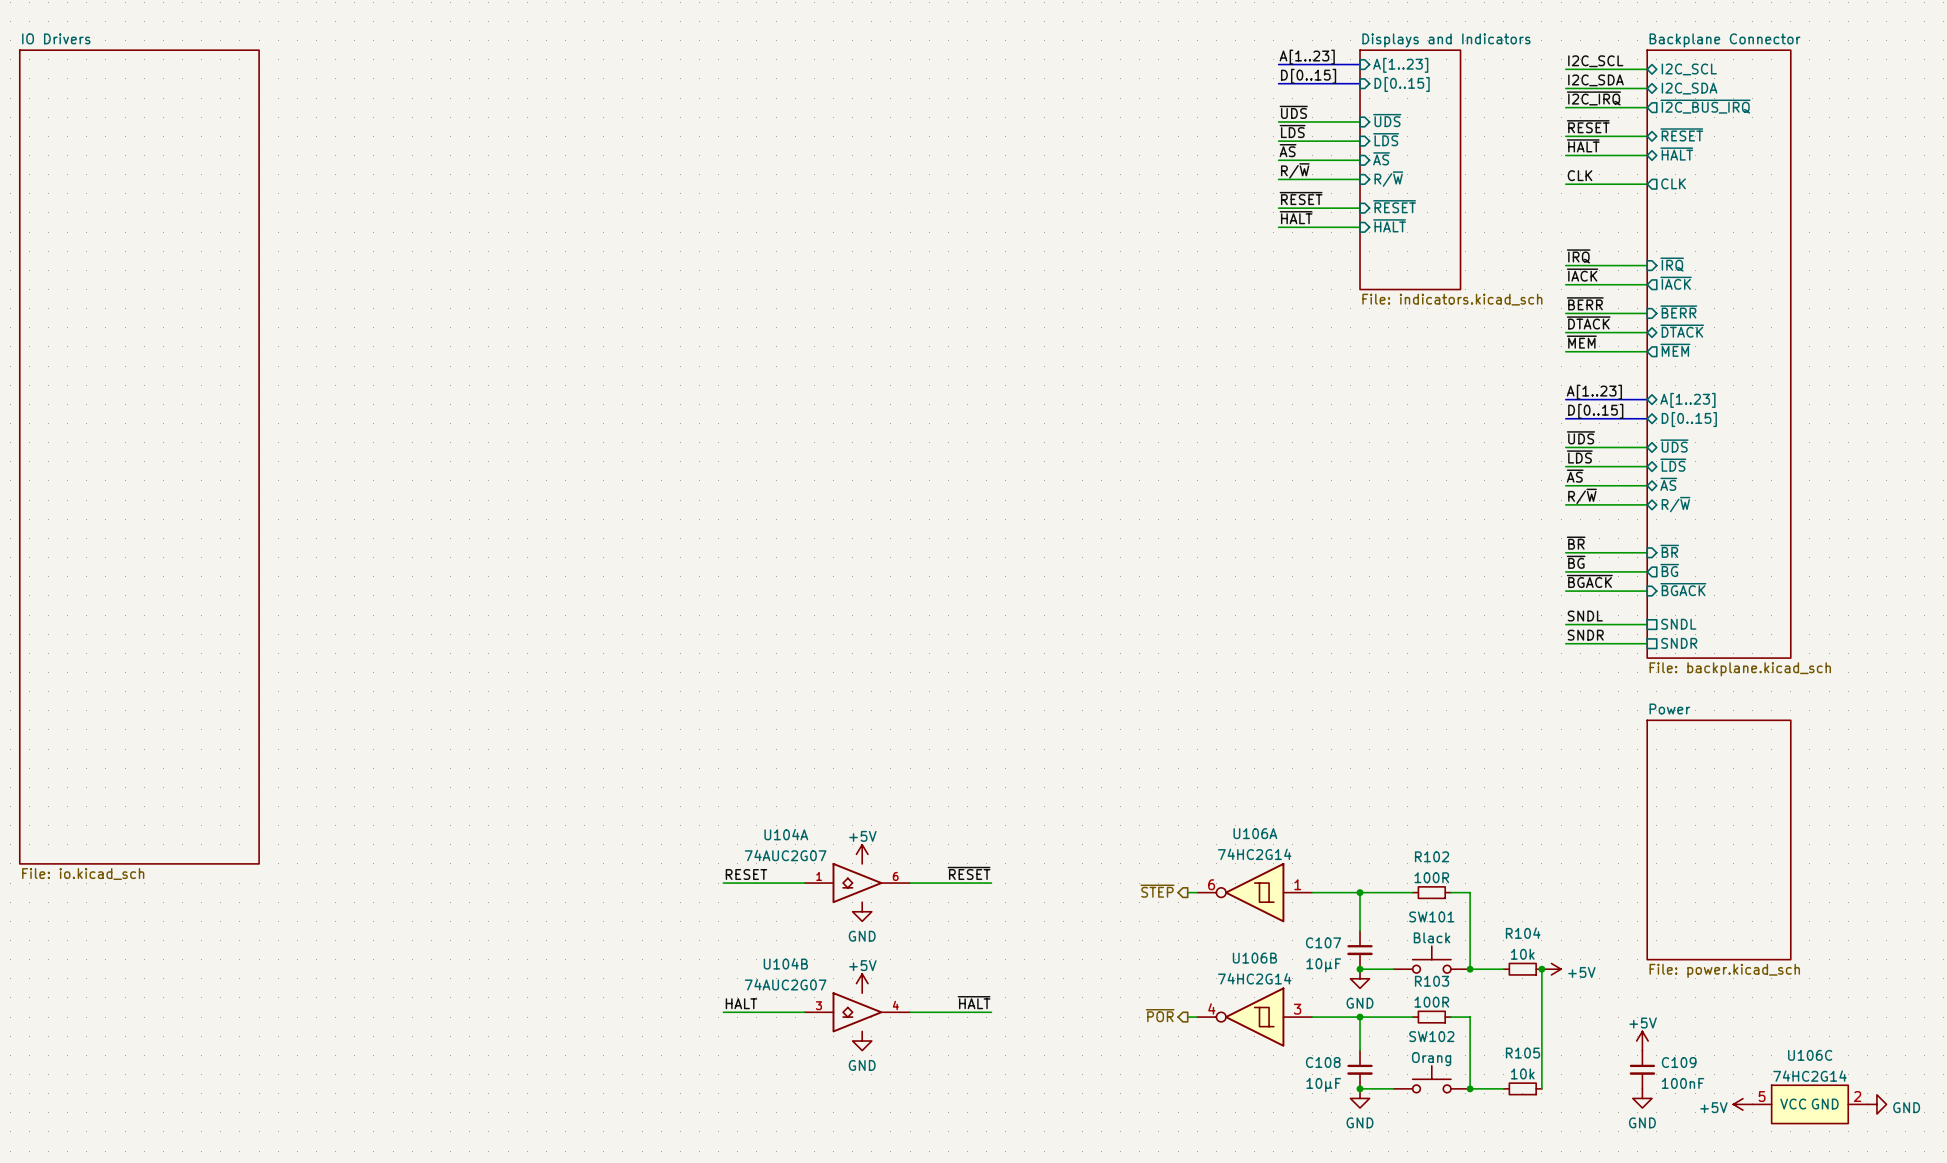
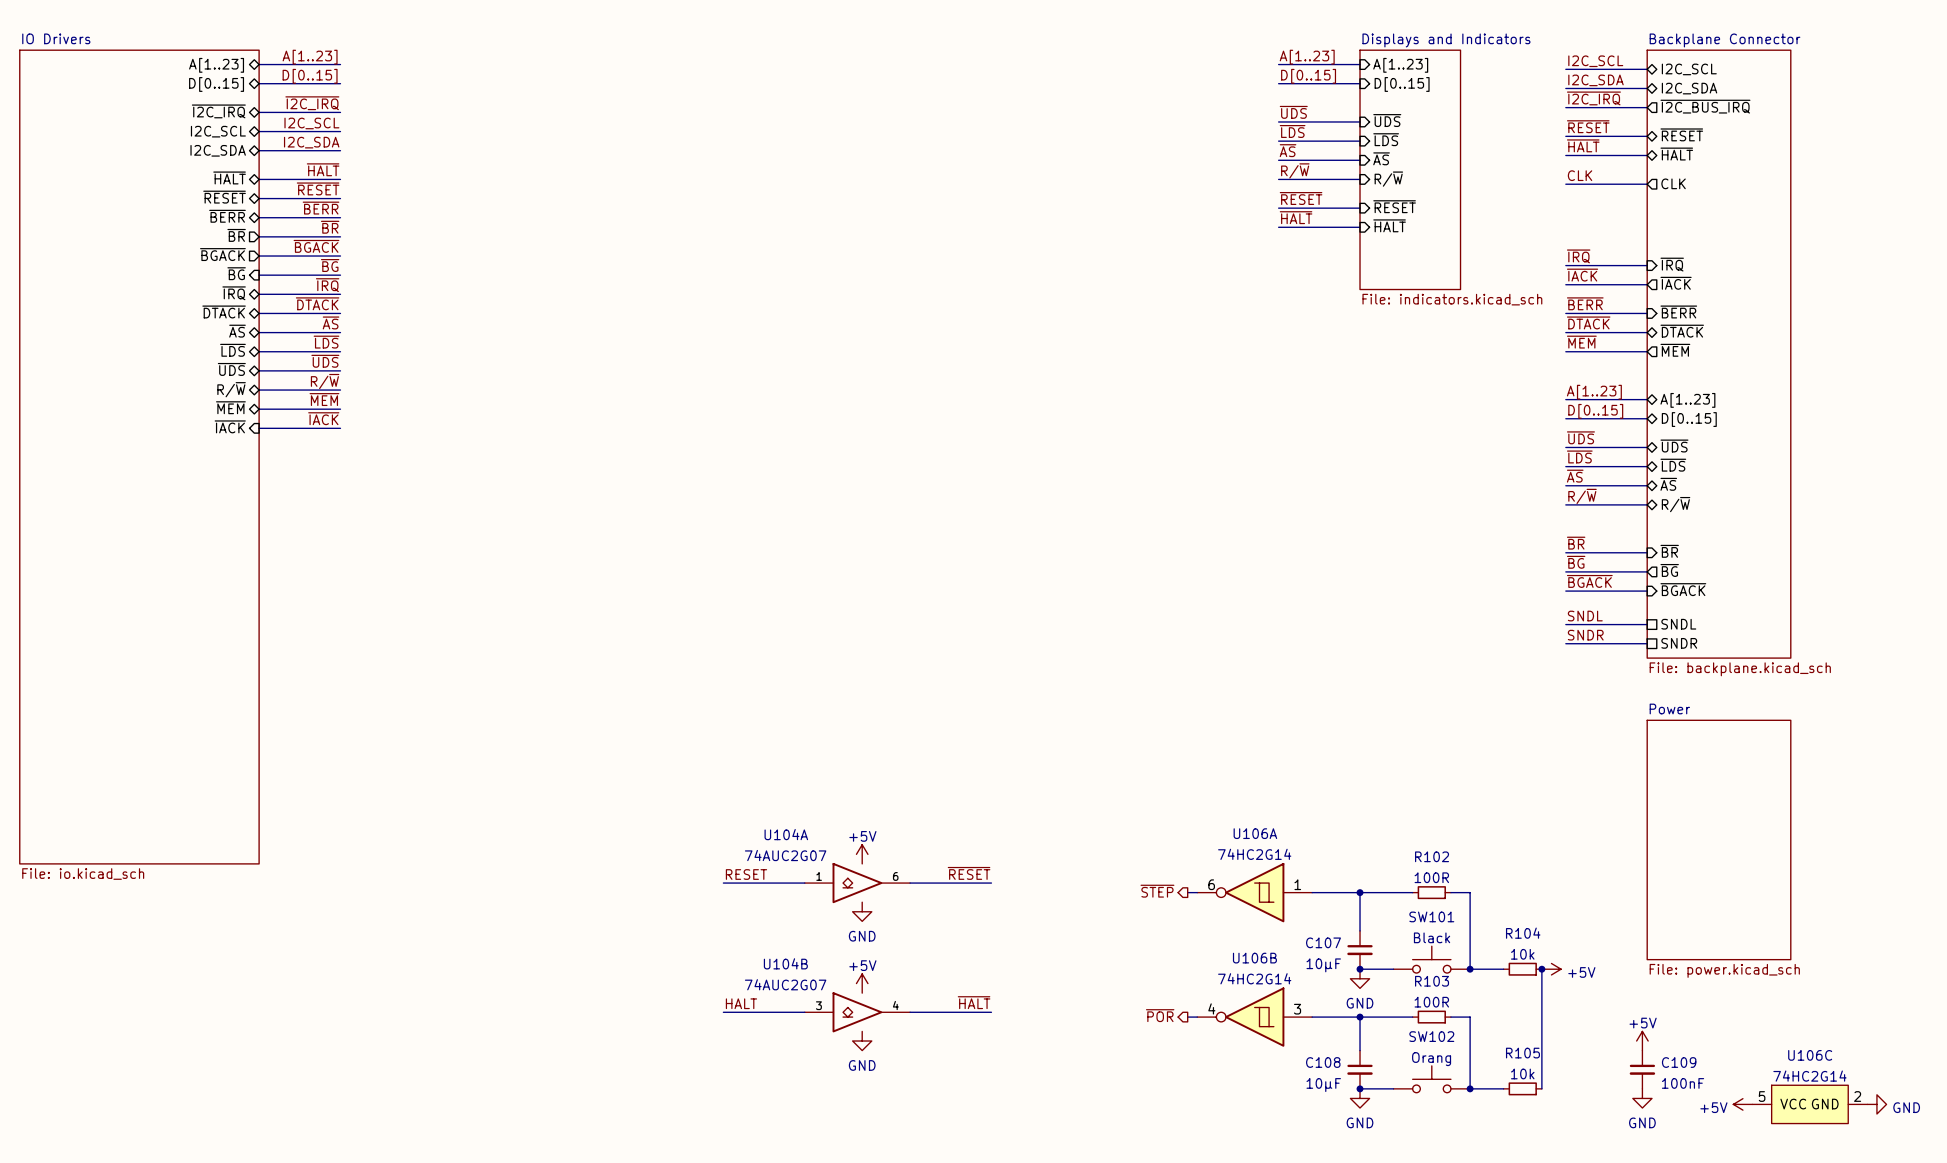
label: none -> A[1..23] (310, 57)
bus: none -> (259, 64) (340, 64)
sheet pin: none -> A[1..23] (216, 65)
label: none -> D[0..15] (310, 76)
bus: none -> (259, 83) (340, 83)
sheet pin: none -> D[0..15] (216, 84)
label: none -> ~{I2C_IRQ} (312, 103)
sheet pin: none -> ~{I2C_IRQ} (218, 111)
wire: none -> (259, 112) (340, 112)
label: none -> I2C_SCL (311, 123)
sheet pin: none -> I2C_SCL (218, 131)
wire: none -> (259, 131) (340, 131)
label: none -> I2C_SDA (311, 142)
sheet pin: none -> I2C_SDA (218, 150)
wire: none -> (259, 150) (340, 150)
label: none -> ~{HALT} (323, 169)
sheet pin: none -> ~{HALT} (229, 177)
wire: none -> (259, 179) (340, 179)
label: none -> ~{RESET} (318, 188)
sheet pin: none -> ~{RESET} (224, 197)
wire: none -> (259, 198) (340, 198)
label: none -> ~{BERR} (321, 208)
sheet pin: none -> ~{BERR} (227, 216)
wire: none -> (259, 217) (340, 217)
label: none -> ~{BR} (330, 227)
sheet pin: none -> ~{BR} (236, 235)
wire: none -> (259, 236) (340, 236)
label: none -> ~{BGACK} (316, 246)
sheet pin: none -> ~{BGACK} (222, 254)
wire: none -> (259, 256) (340, 256)
label: none -> ~{BG} (330, 265)
sheet pin: none -> ~{BG} (236, 273)
wire: none -> (259, 275) (340, 275)
label: none -> ~{IRQ} (327, 285)
sheet pin: none -> ~{IRQ} (234, 293)
wire: none -> (259, 294) (340, 294)
label: none -> ~{DTACK} (317, 303)
sheet pin: none -> ~{DTACK} (224, 311)
wire: none -> (259, 313) (340, 313)
label: none -> ~{AS} (331, 322)
sheet pin: none -> ~{AS} (237, 331)
wire: none -> (259, 332) (340, 332)
label: none -> ~{LDS} (326, 342)
sheet pin: none -> ~{LDS} (232, 350)
wire: none -> (259, 351) (340, 351)
label: none -> ~{UDS} (325, 361)
sheet pin: none -> ~{UDS} (231, 369)
wire: none -> (259, 370) (340, 370)
label: none -> R/~{W} (325, 381)
sheet pin: none -> R/~{W} (231, 389)
wire: none -> (259, 390) (340, 390)
label: none -> ~{MEM} (324, 399)
sheet pin: none -> ~{MEM} (230, 407)
wire: none -> (259, 409) (340, 409)
label: none -> ~{IACK} (323, 418)
sheet pin: none -> ~{IACK} (230, 426)
wire: none -> (259, 428) (340, 428)

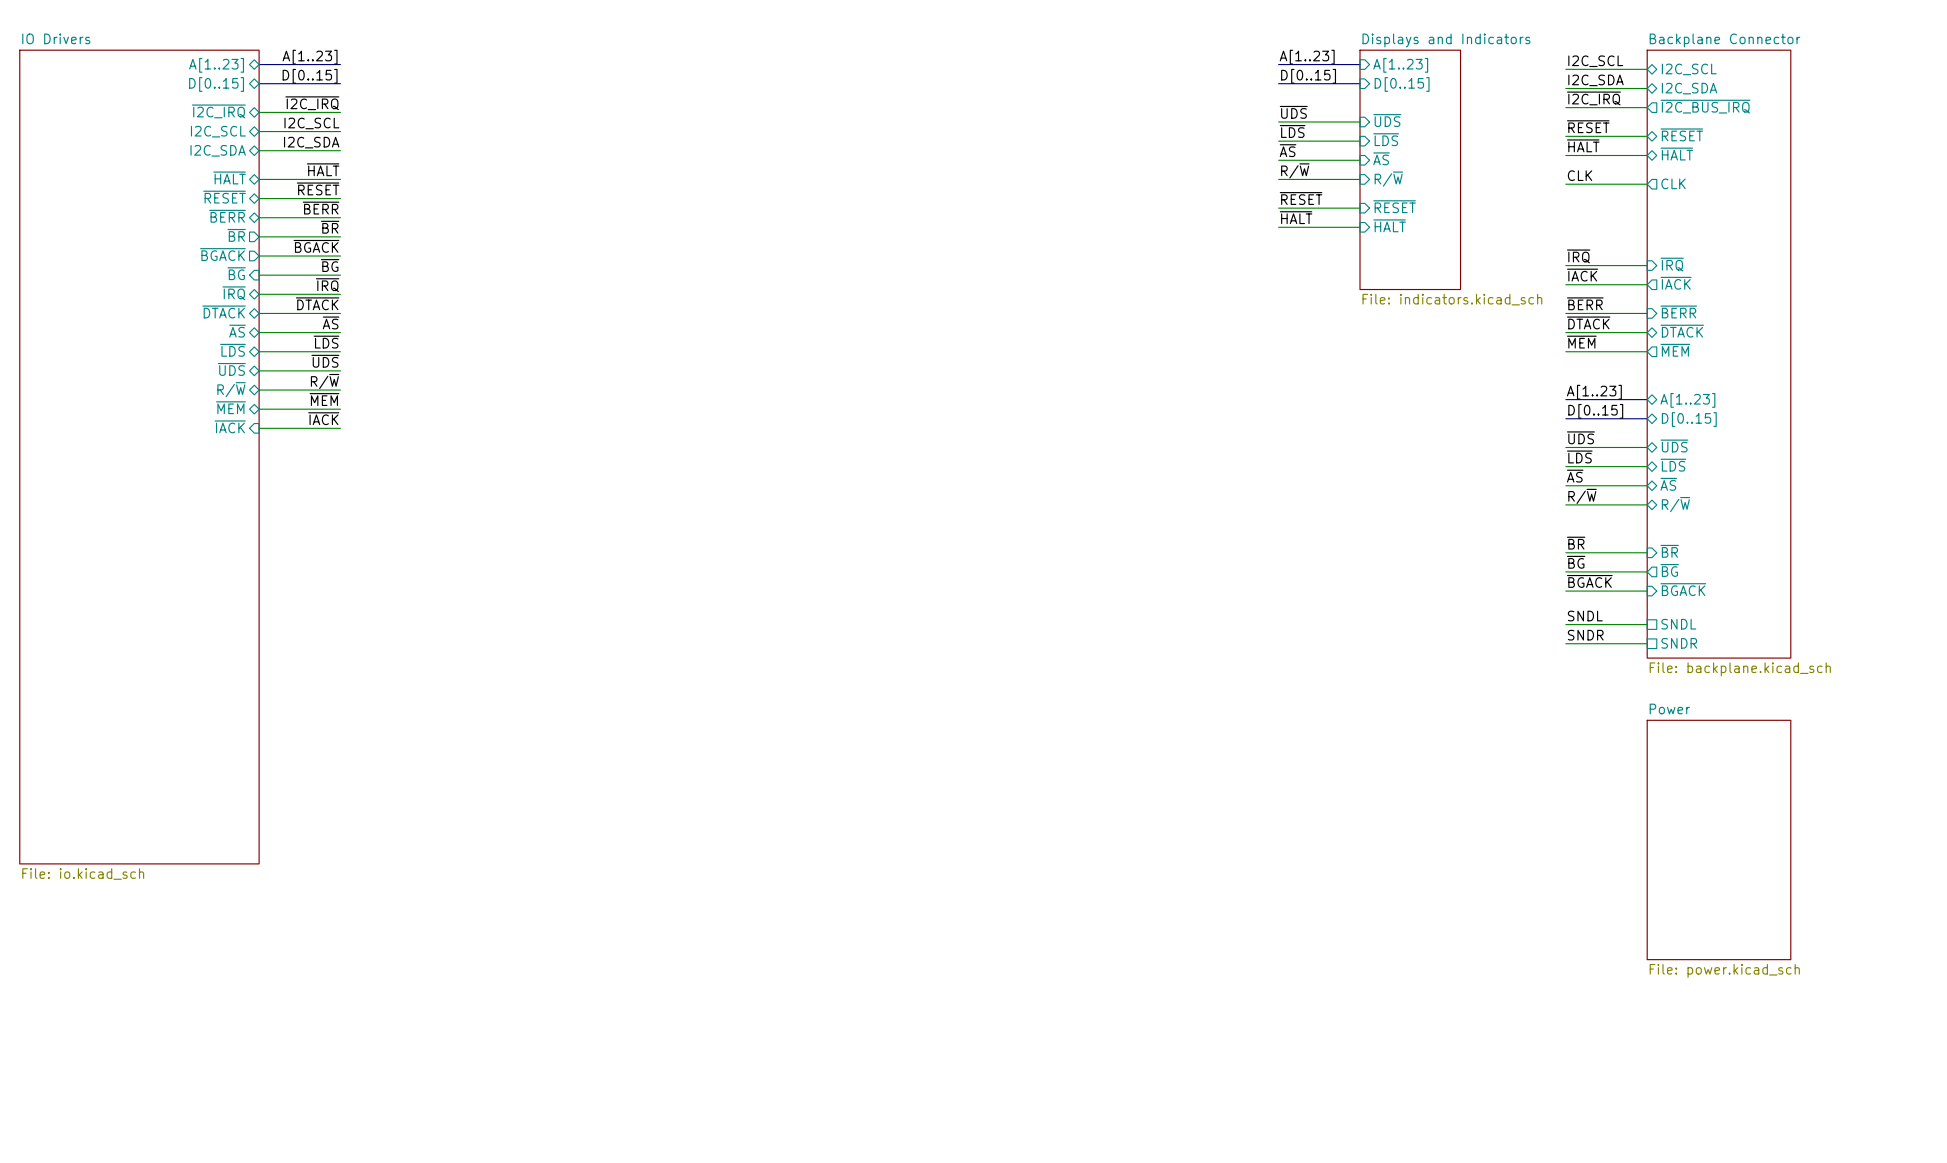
power symbol: +5V (862, 854) -> none
label: ~{RESET} (969, 873) -> none
label: RESET (746, 874) -> none
wire: (723, 883) (804, 883) -> none
U104A: 74AUC2G07 (857, 883) -> none
wire: (910, 883) (991, 883) -> none
hierarchical label: ~{STEP} (1157, 891) -> none
wire: (1187, 892) (1197, 892) -> none
U106A: 74HC2G14 (1254, 892) -> none
wire: (1312, 892) (1412, 892) -> none
wire: (1360, 892) (1360, 930) -> none
junction: (1360, 892) -> none
R102: 100R (1431, 892) -> none
wire: (1450, 892) (1470, 892) (1470, 969) (1503, 969) -> none
power symbol: GND (862, 911) -> none
C107: 10µF (1360, 950) -> none
SW101: Black (1431, 959) -> none
wire: (1360, 969) (1393, 969) -> none
junction: (1360, 969) -> none
junction: (1470, 969) -> none
R104: 10k (1522, 969) -> none
wire: (1541, 969) (1541, 1088) -> none
junction: (1541, 969) -> none
power symbol: +5V (1551, 969) -> none
power symbol: GND (1360, 978) -> none
power symbol: +5V (862, 983) -> none
label: ~{HALT} (974, 1002) -> none
label: HALT (741, 1003) -> none
wire: (723, 1012) (804, 1012) -> none
U104B: 74AUC2G07 (857, 1012) -> none
wire: (910, 1012) (991, 1012) -> none
hierarchical label: ~{POR} (1160, 1015) -> none
wire: (1187, 1017) (1197, 1017) -> none
U106B: 74HC2G14 (1254, 1017) -> none
wire: (1312, 1017) (1412, 1017) -> none
wire: (1360, 1017) (1360, 1050) -> none
junction: (1360, 1017) -> none
R103: 100R (1431, 1017) -> none
wire: (1450, 1017) (1470, 1017) (1470, 1088) (1503, 1088) -> none
power symbol: GND (862, 1041) -> none
power symbol: +5V (1642, 1041) -> none
C108: 10µF (1360, 1069) -> none
C109: 100nF (1642, 1069) -> none
SW102: Orang (1431, 1079) -> none
wire: (1360, 1088) (1393, 1088) -> none
junction: (1360, 1088) -> none
junction: (1470, 1088) -> none
R105: 10k (1522, 1088) -> none
power symbol: GND (1360, 1098) -> none
power symbol: GND (1642, 1098) -> none
power symbol: +5V (1742, 1104) -> none
U106C: 74HC2G14 (1809, 1104) -> none
power symbol: GND (1876, 1104) -> none

